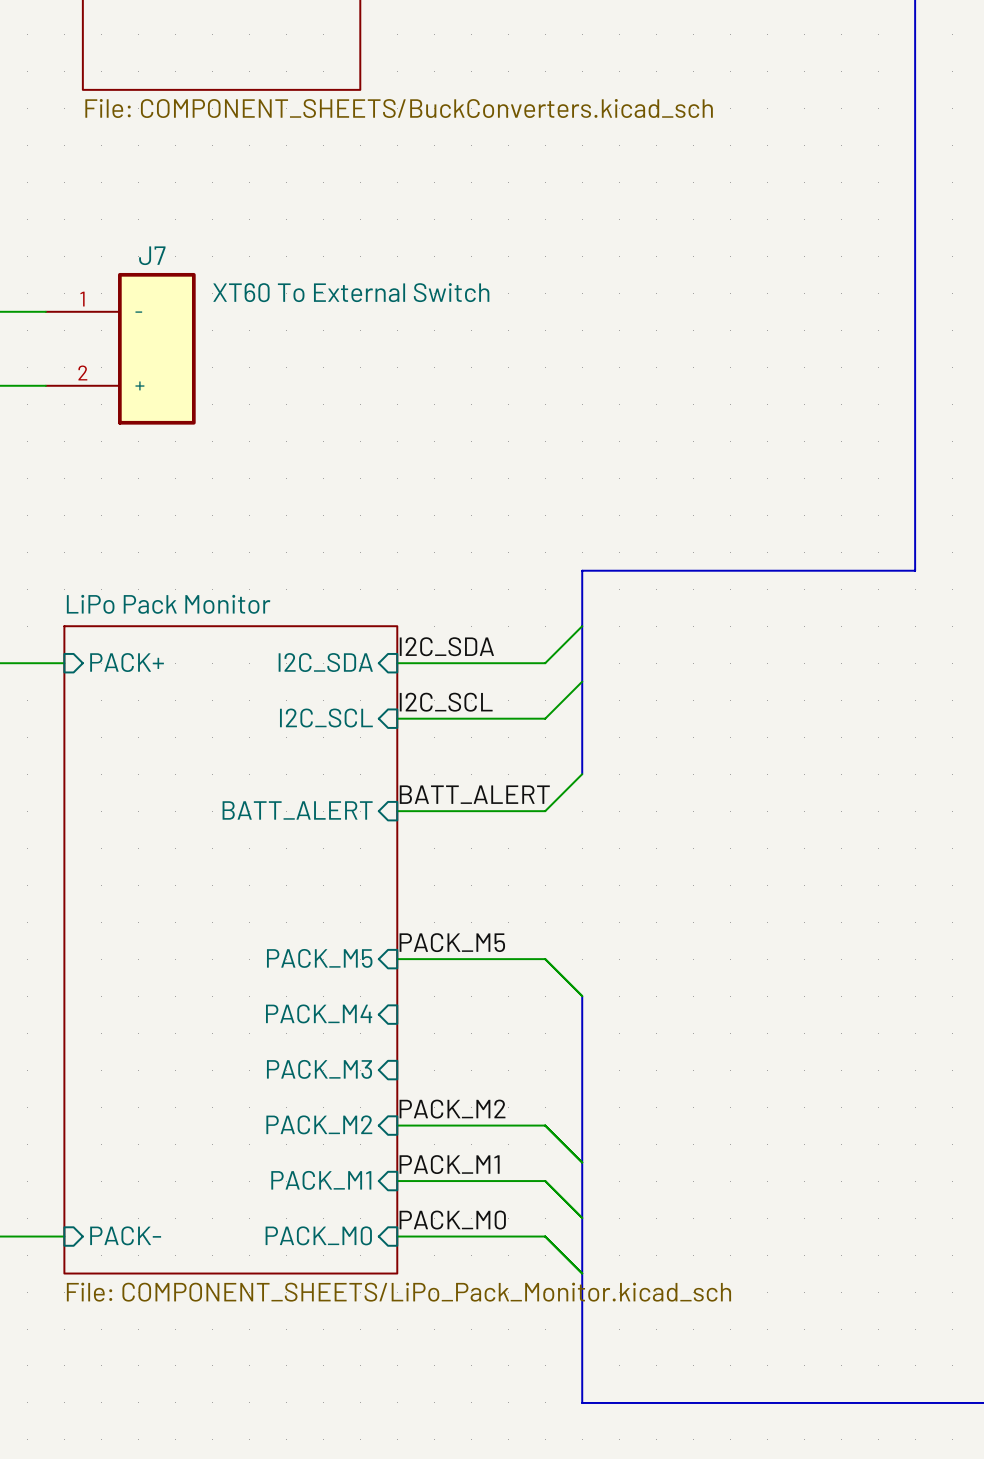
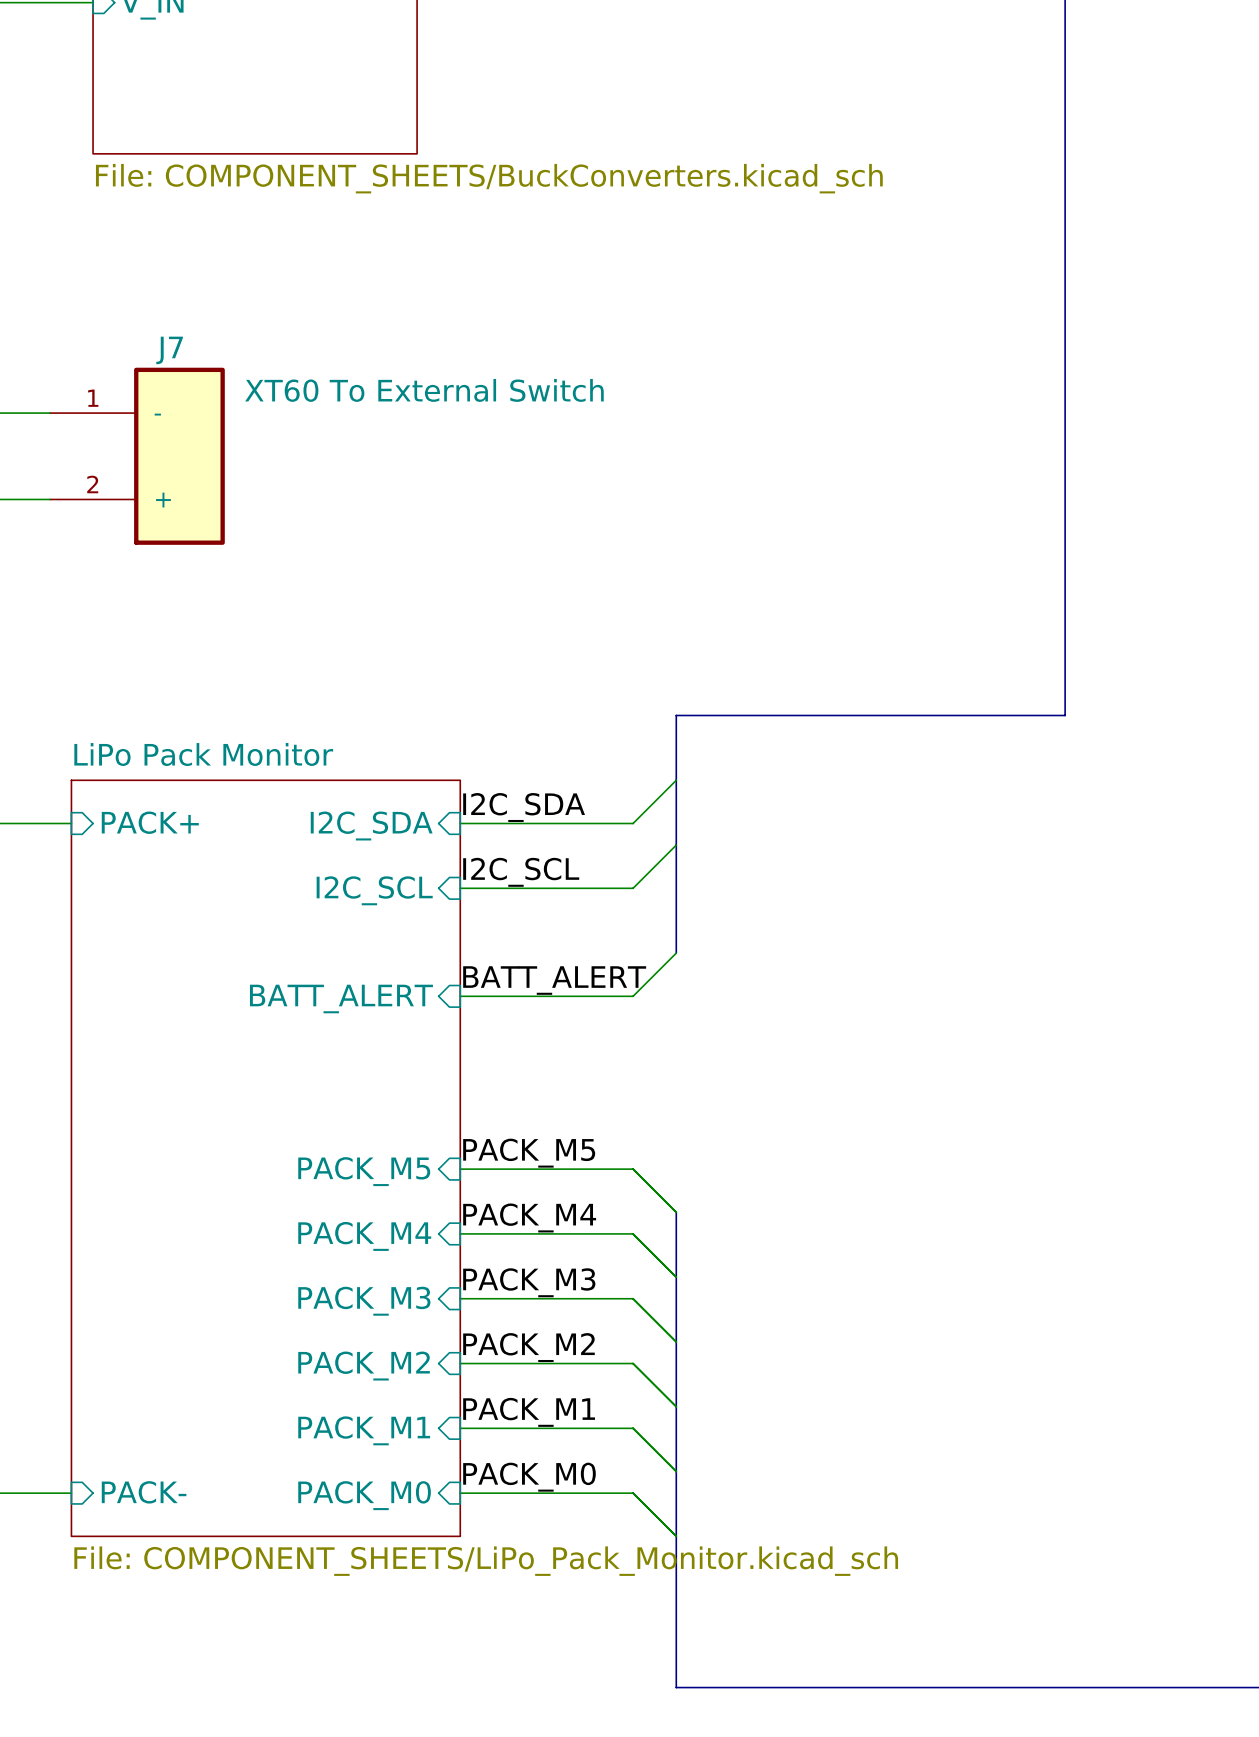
label: none -> PACK_M4 (529, 1217)
wire: none -> (460, 1233) (633, 1233) (676, 1277)
label: none -> PACK_M3 (529, 1282)
wire: none -> (460, 1298) (633, 1298) (676, 1341)

